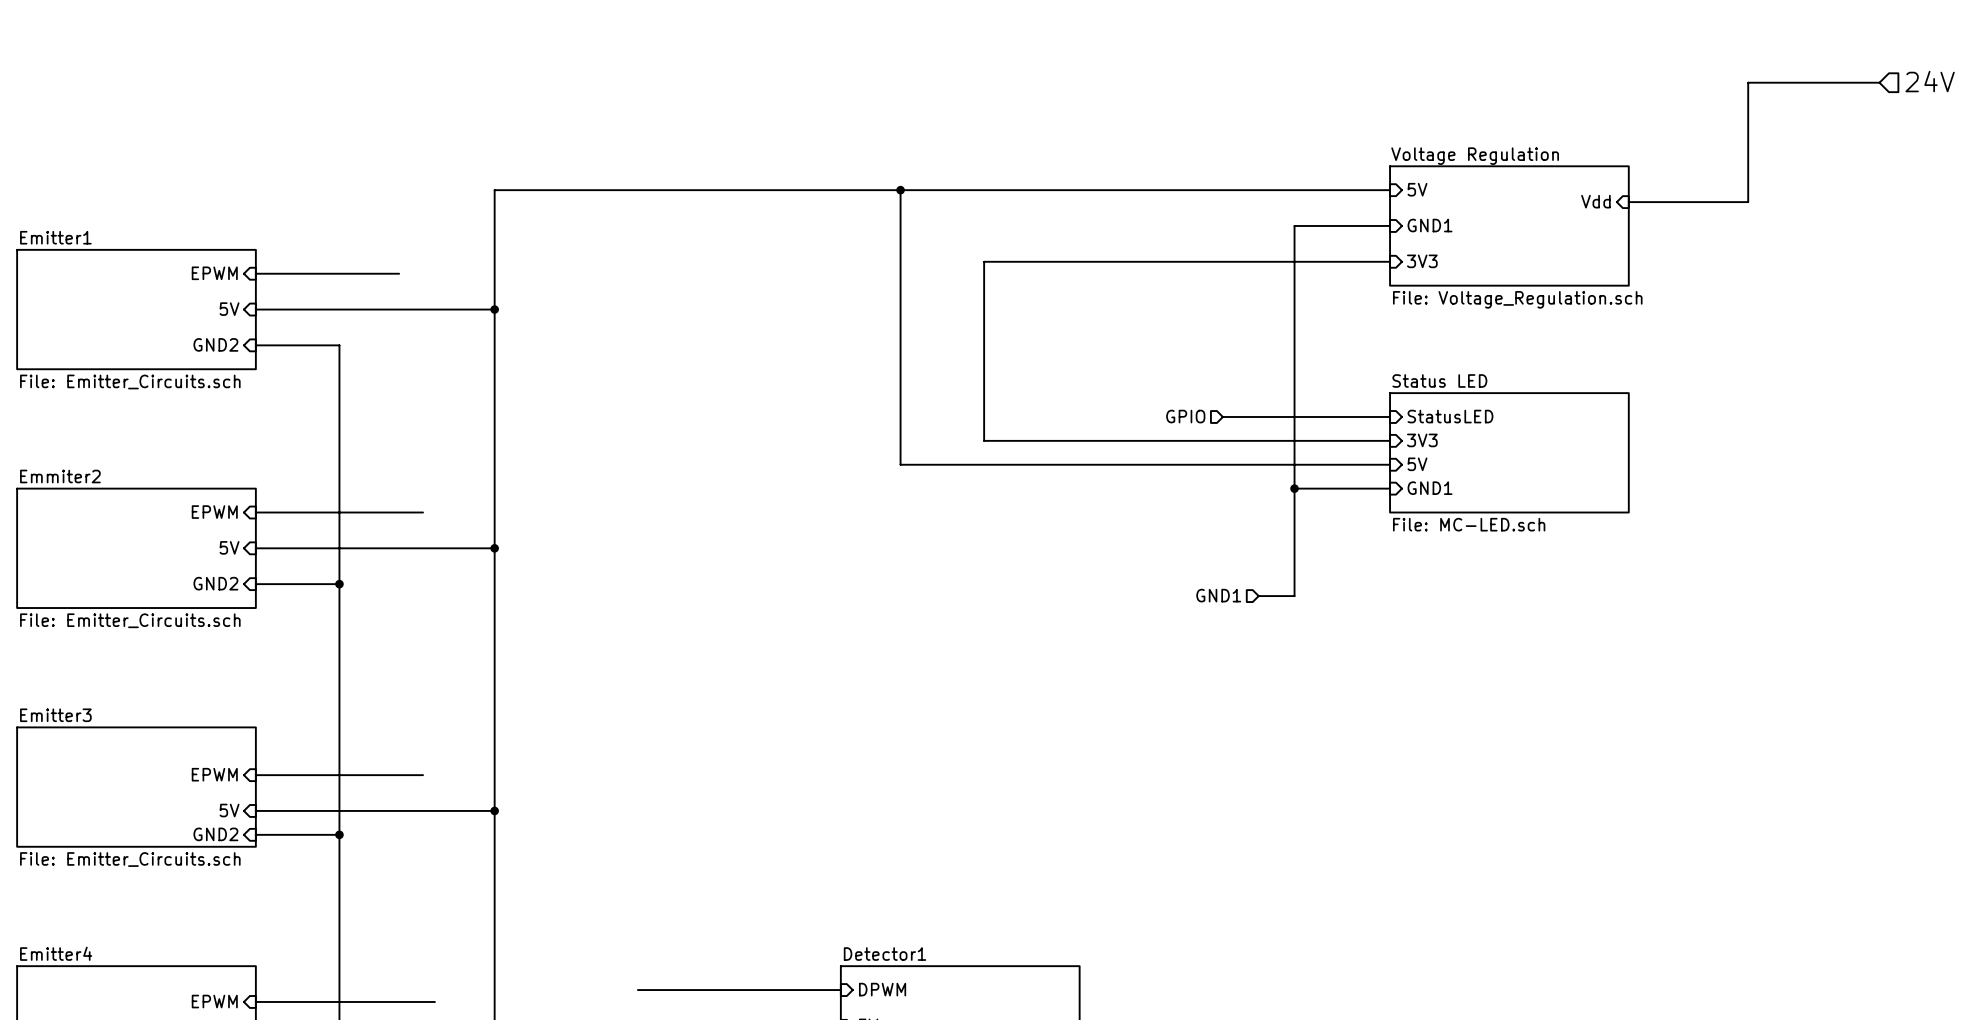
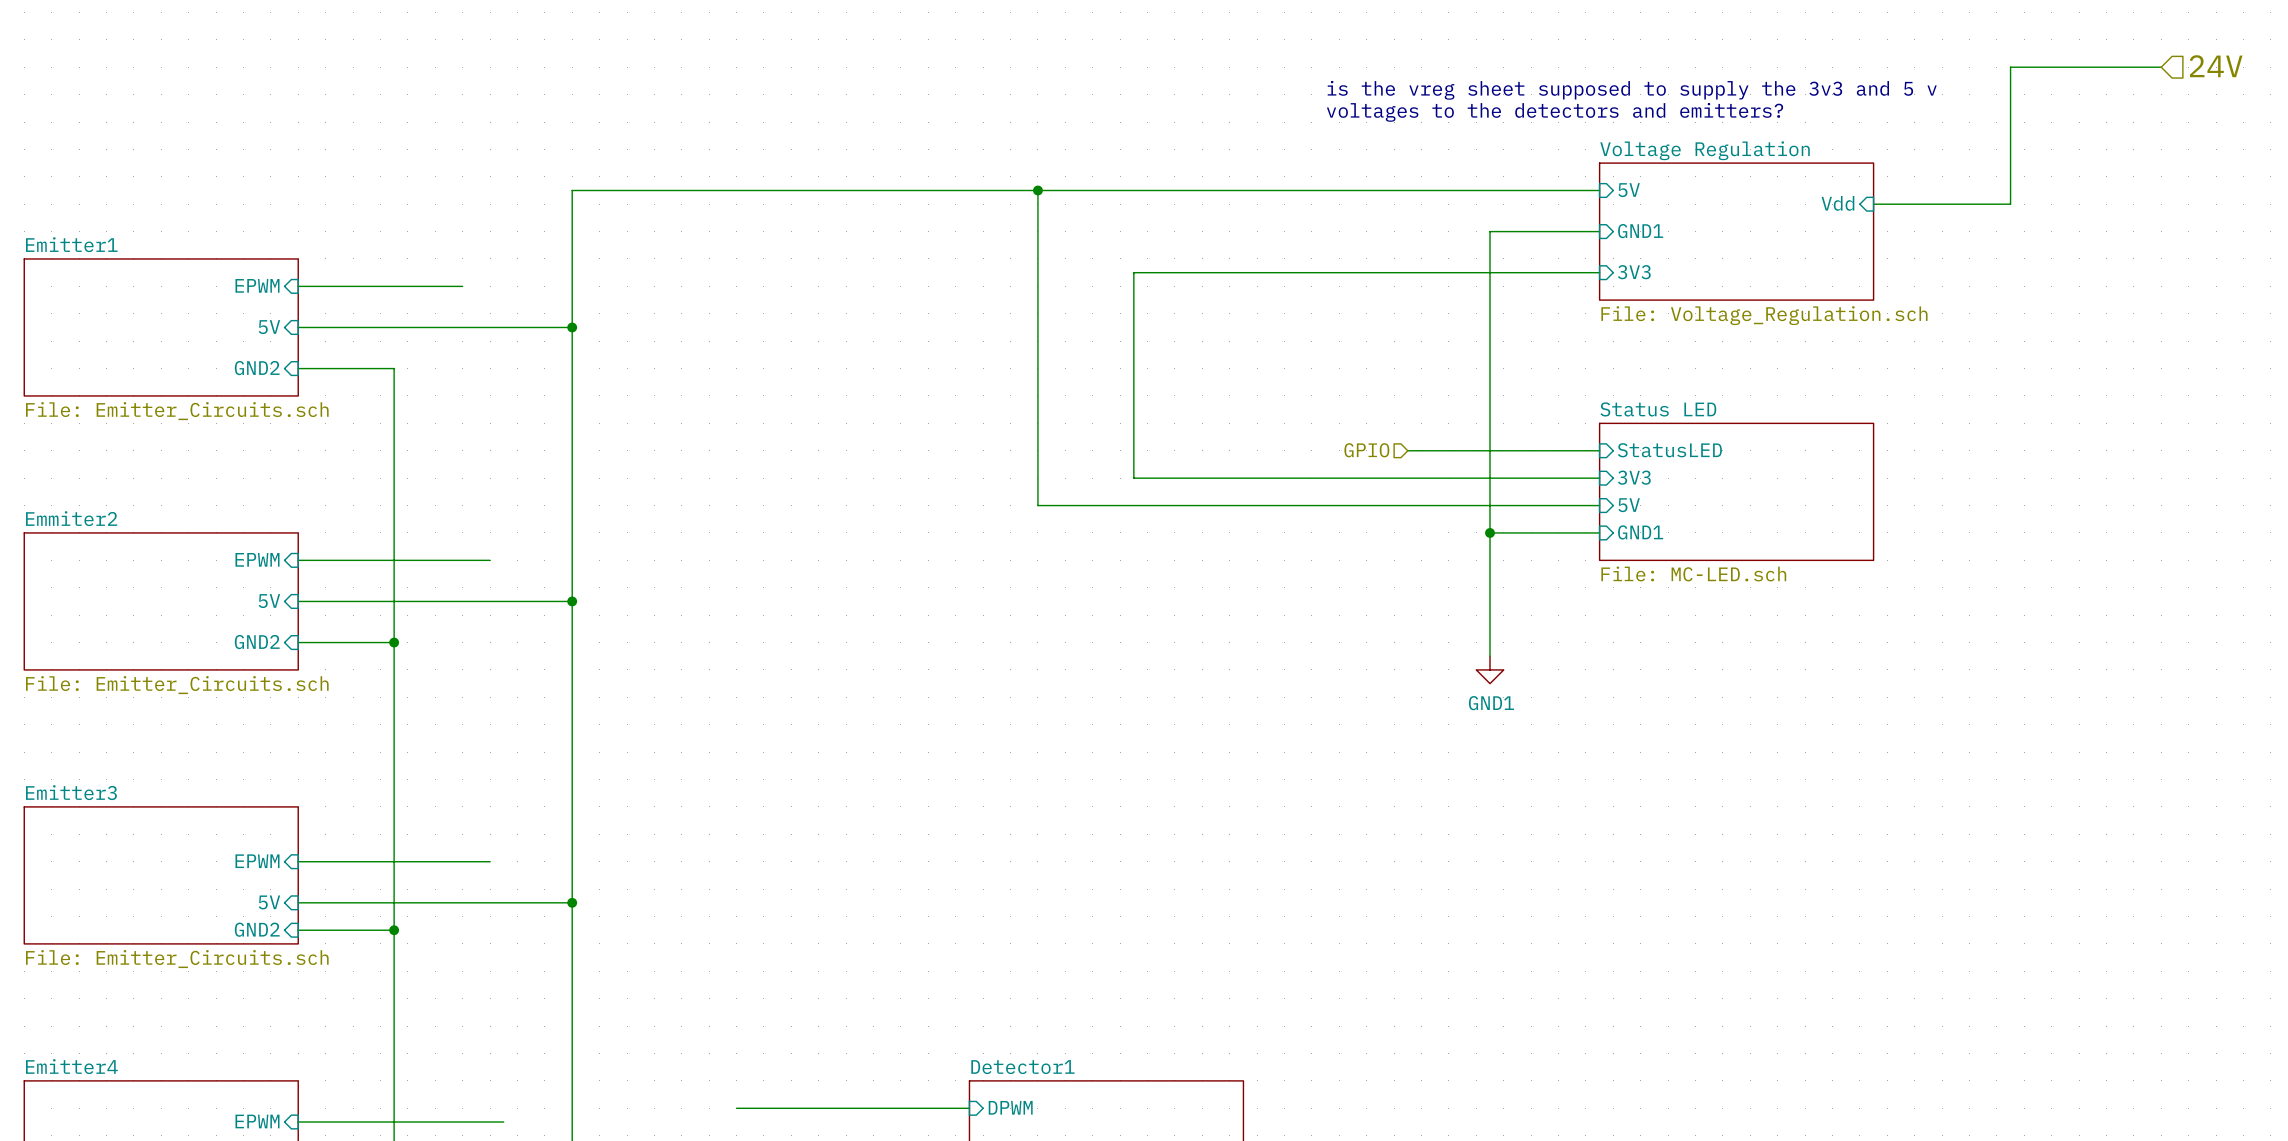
text: none -> is the vreg sheet supposed to supply the 3v3 and 5 v (1632, 90)
text: none -> voltages to the detectors and emitters? (1555, 112)
hierarchical label: GND1 (1218, 595) -> none
wire: (1258, 596) (1294, 596) -> none
power symbol: none -> GND1 (1490, 669)

